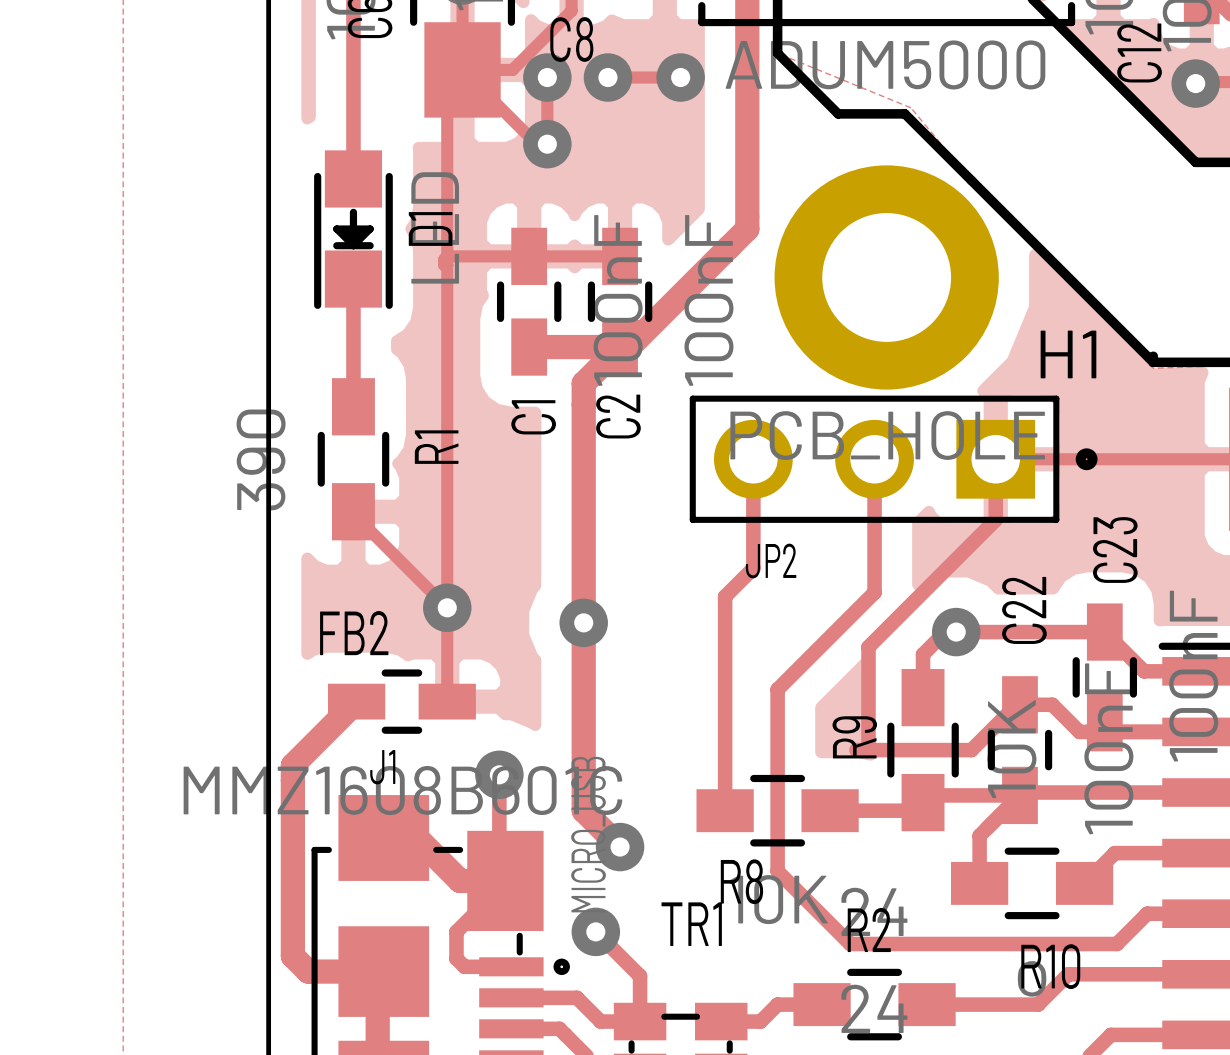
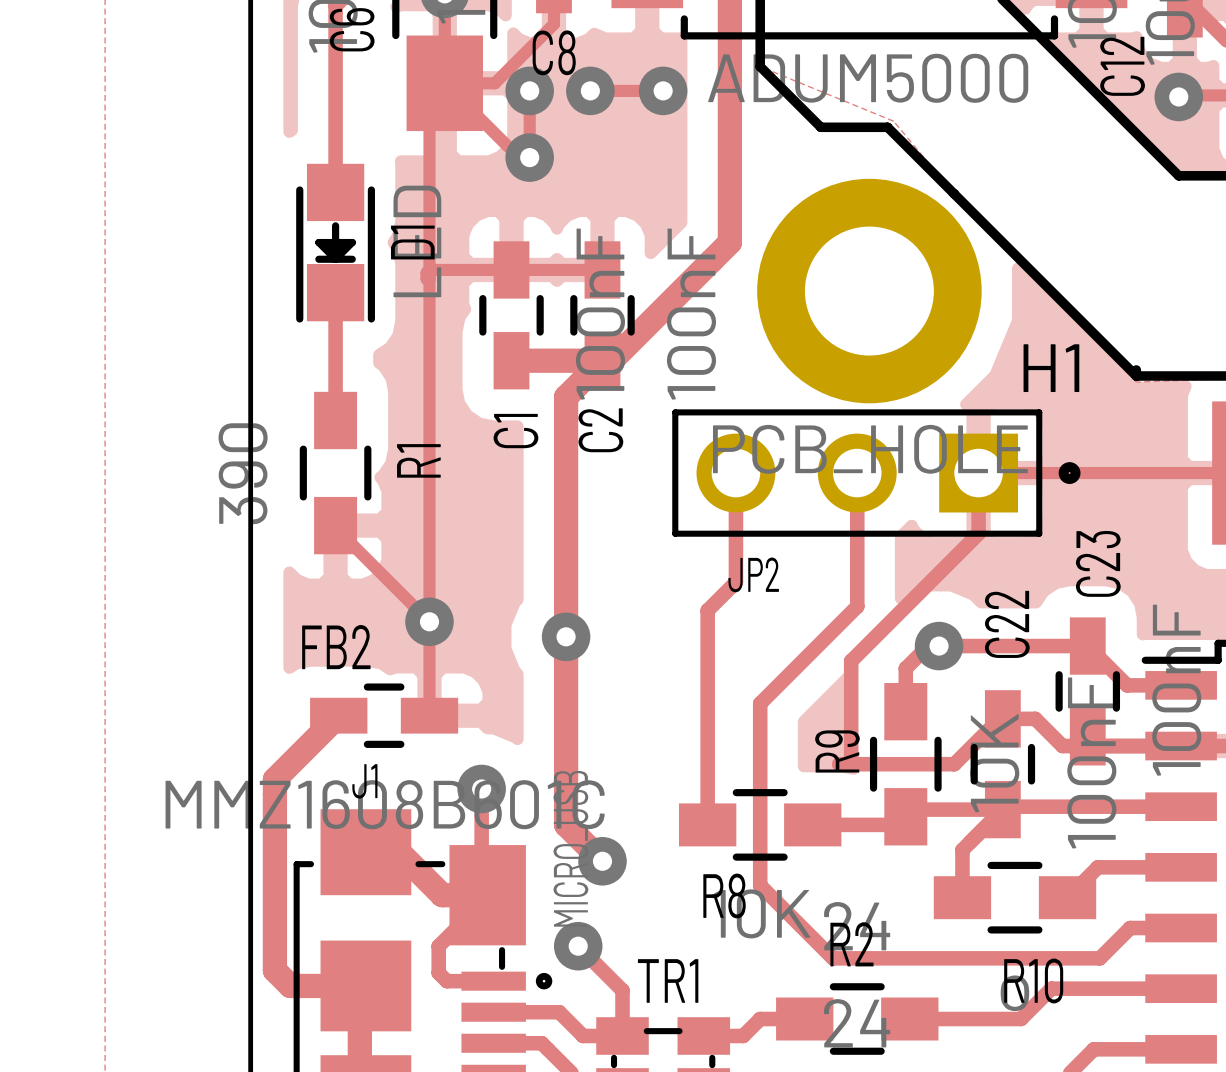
TR1 name position: TR1 (691, 924) -> TR1 (668, 980)

